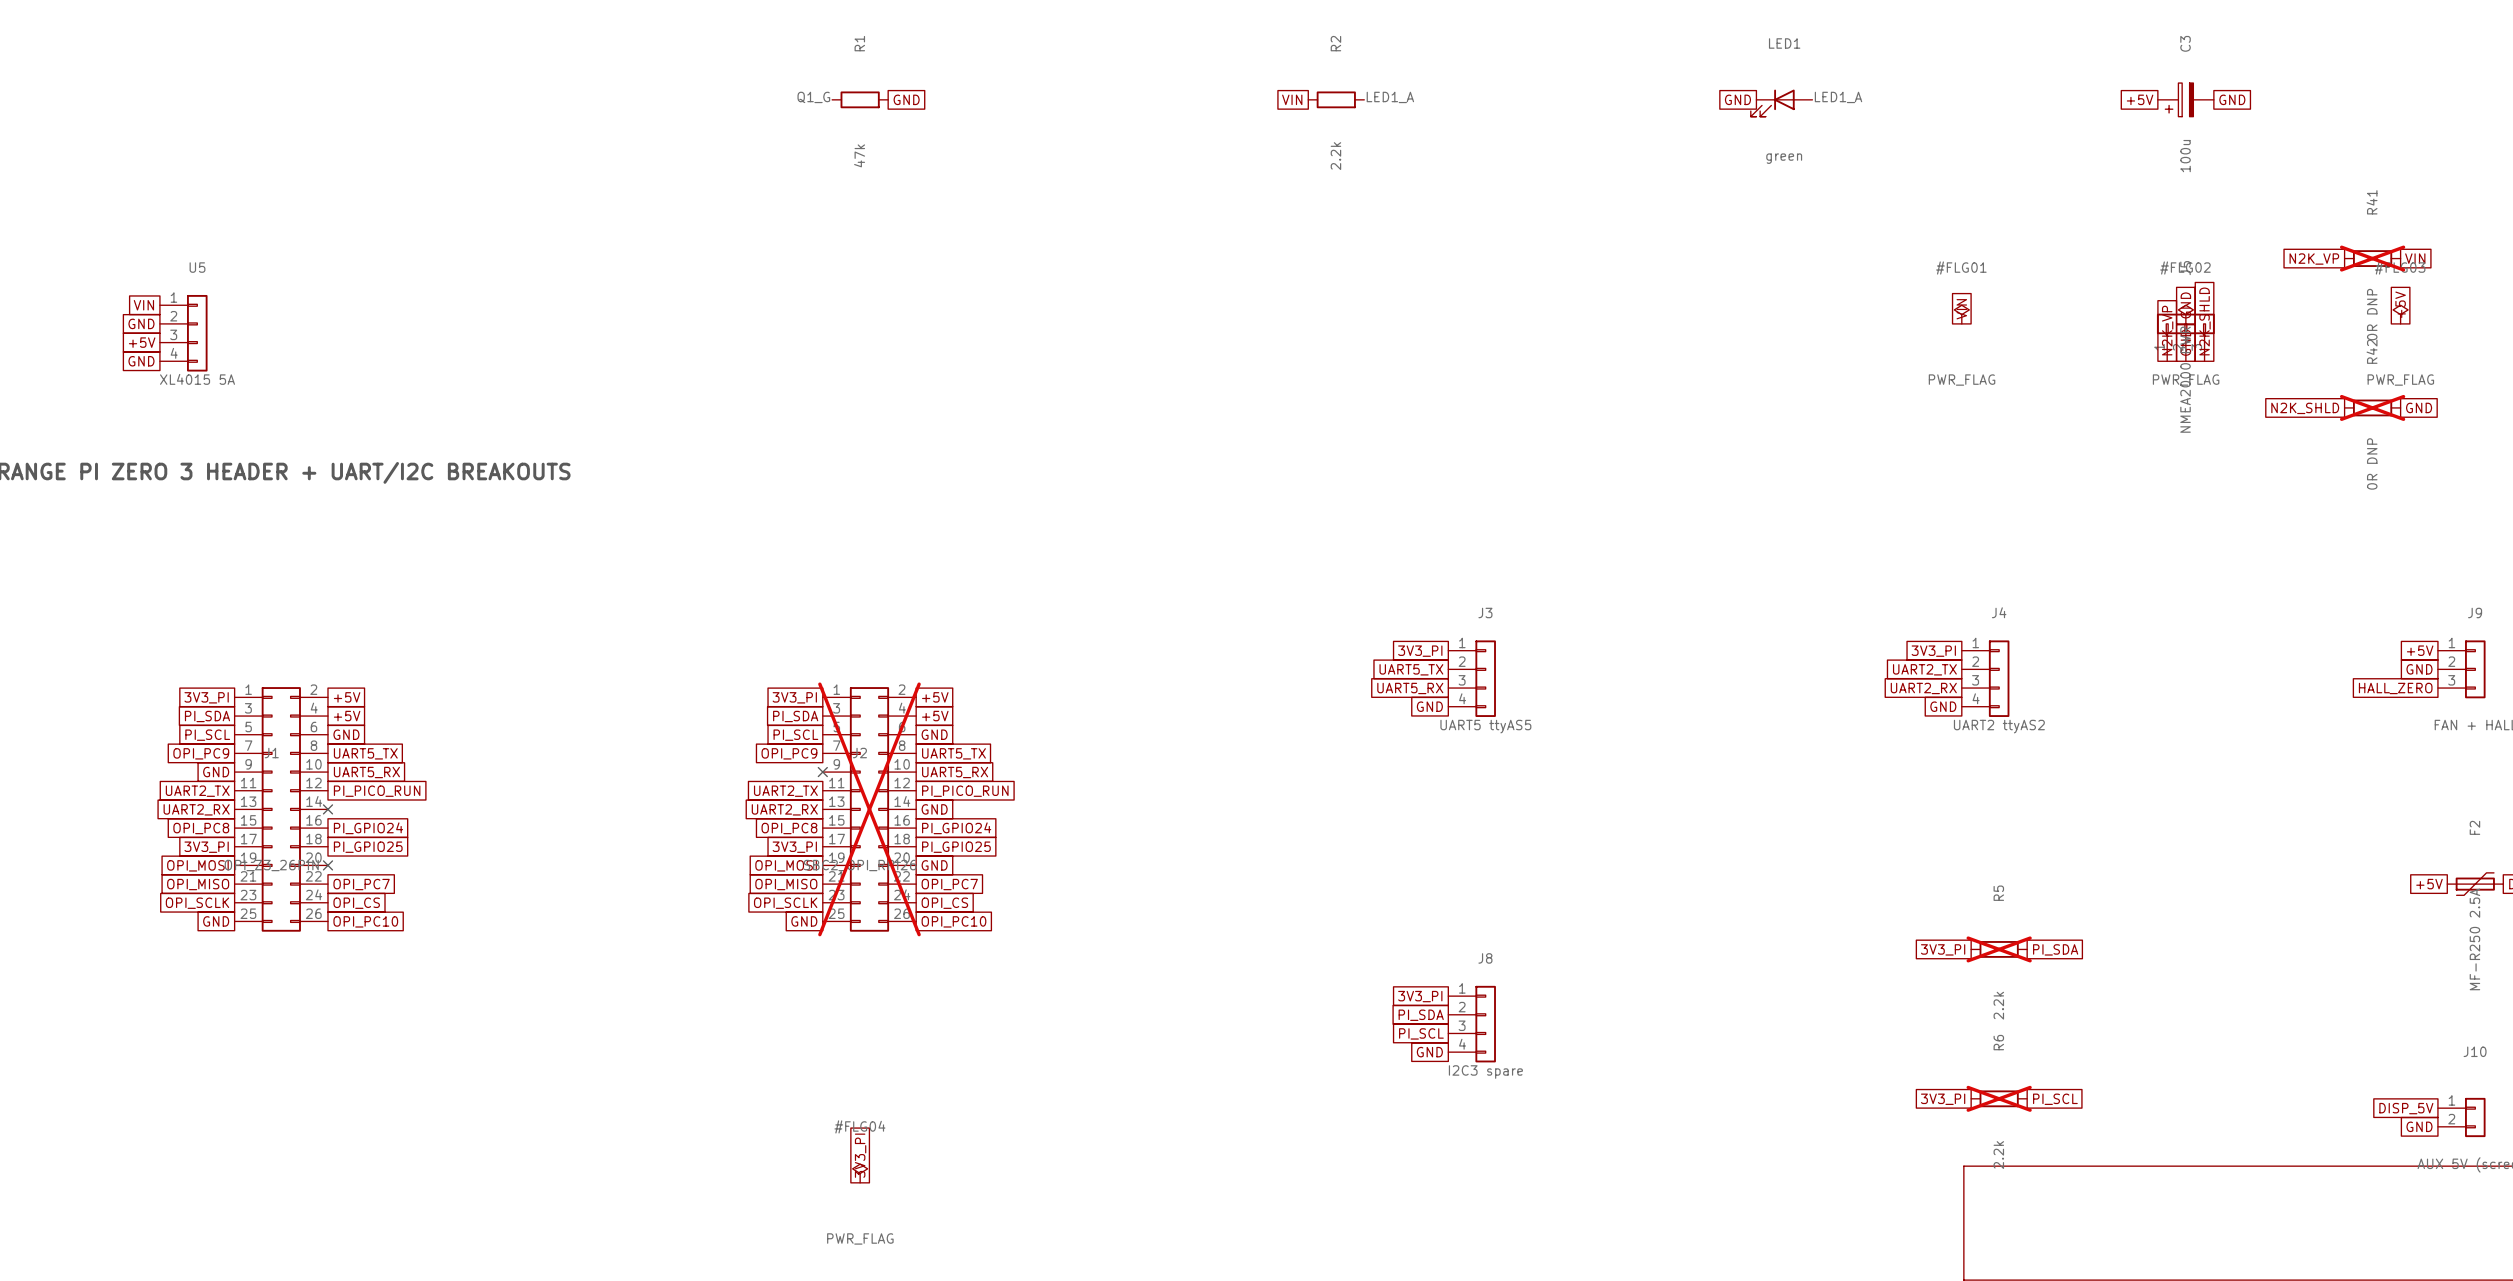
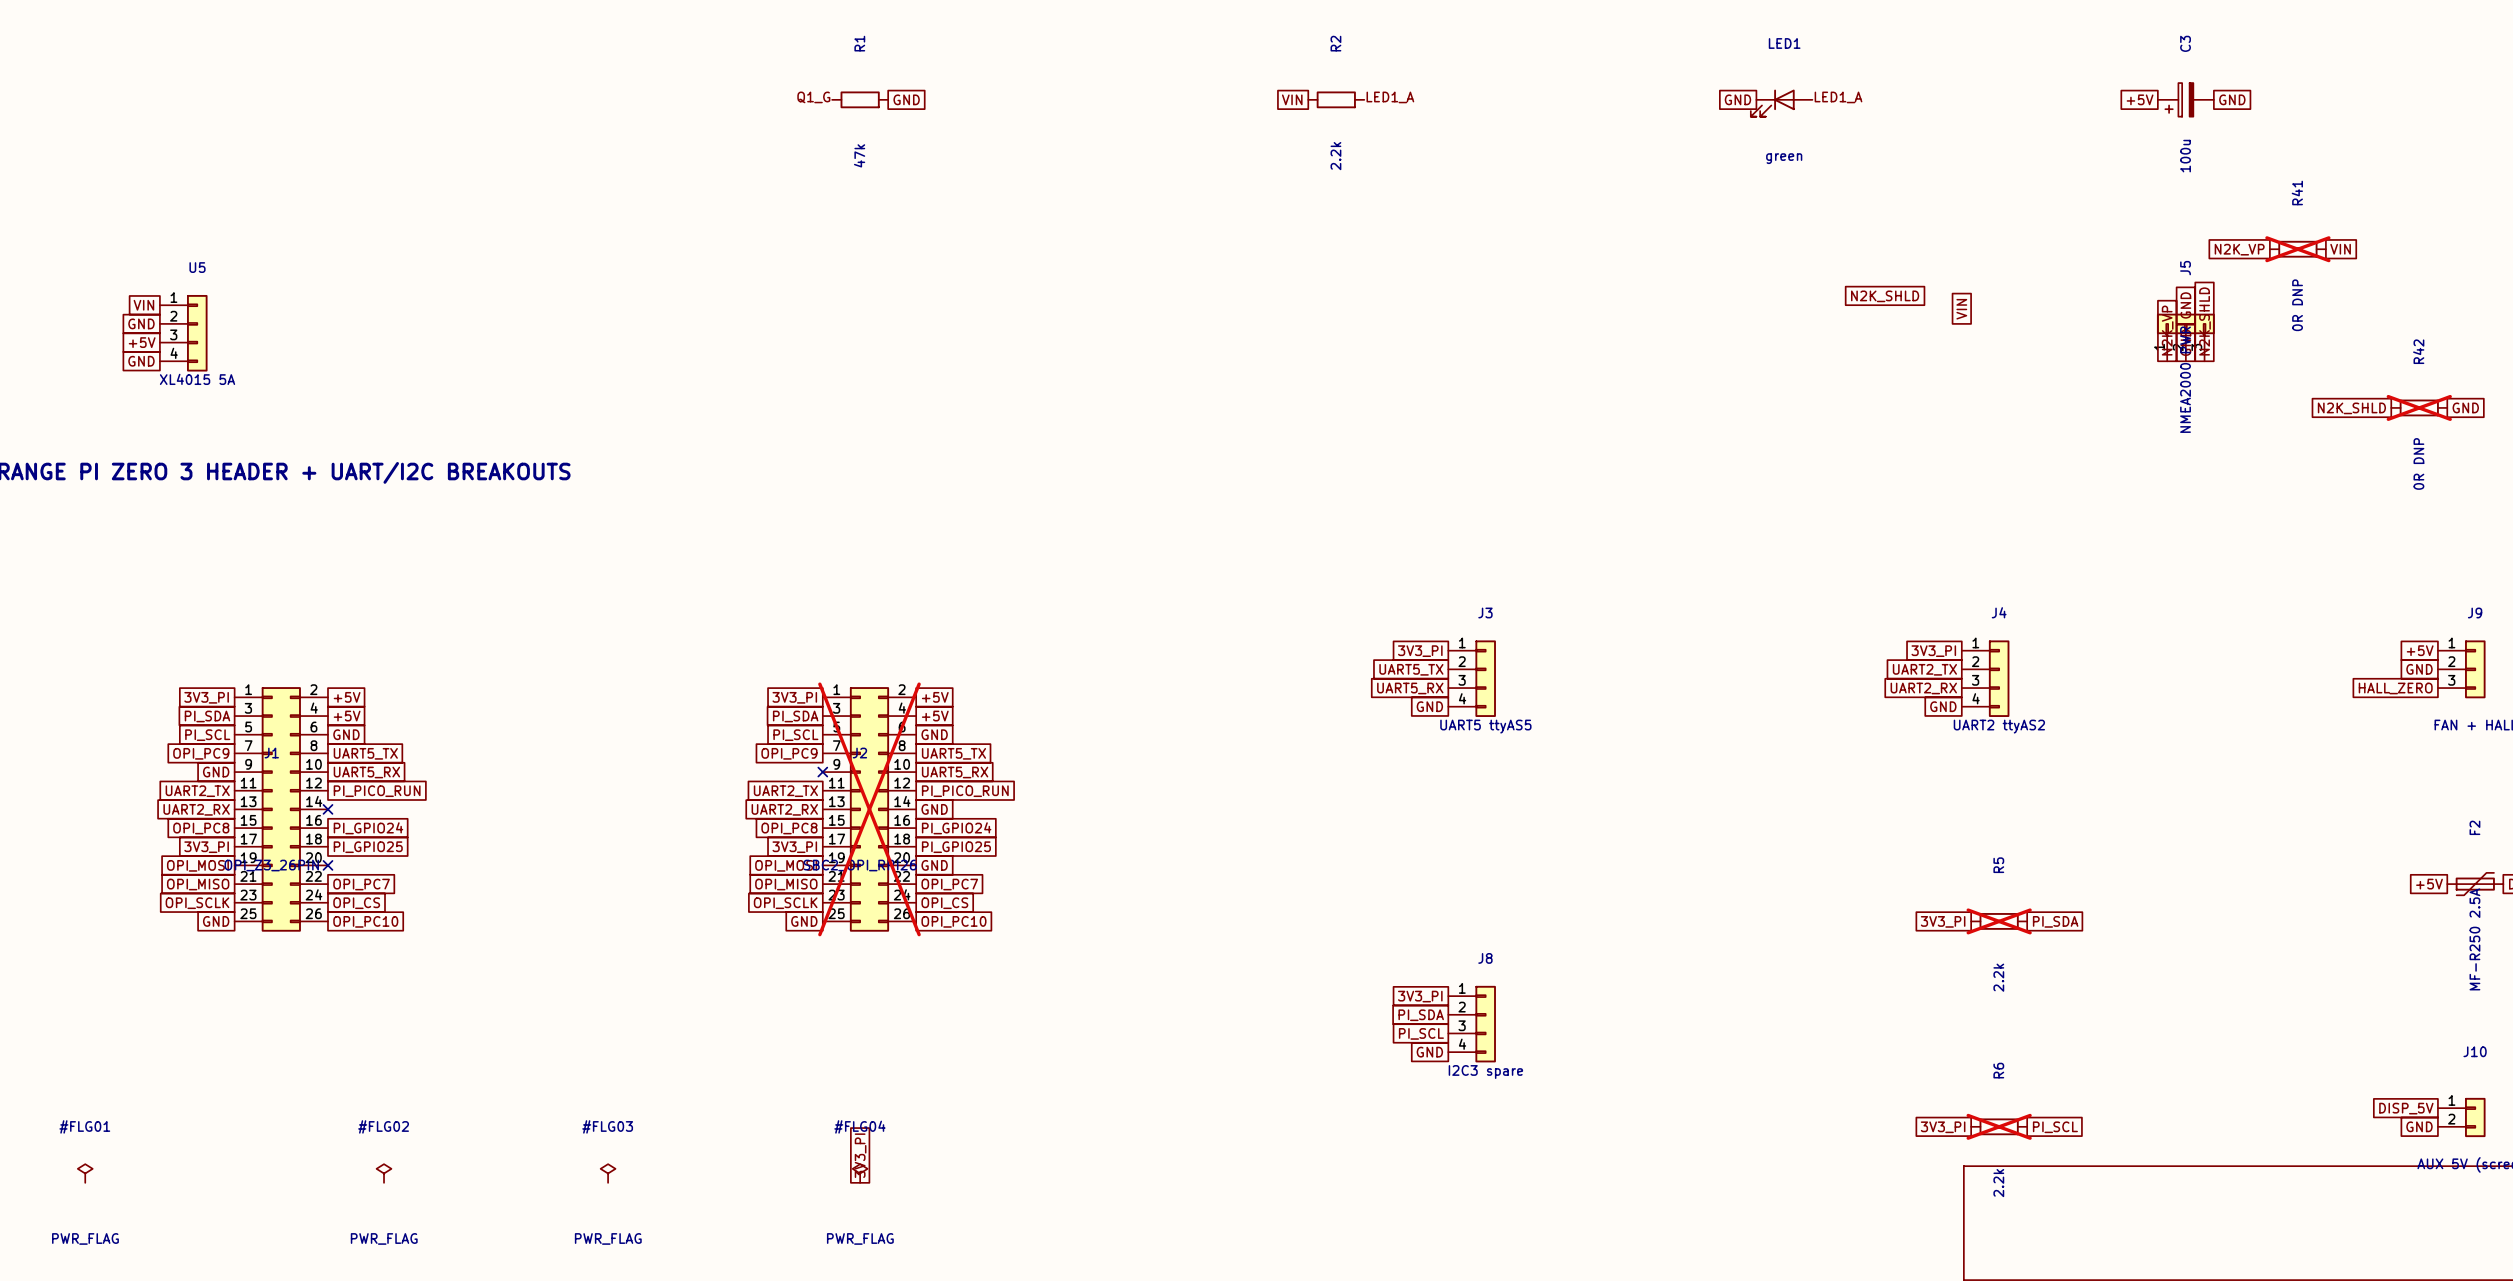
R41 position: (2372, 258) -> (2297, 249)
global label position: VIN (2415, 258) -> VIN (2340, 249)
global label position: N2K_VP (2314, 259) -> N2K_VP (2239, 249)
global label: none -> N2K_SHLD (1885, 296)
global label: +5V (2400, 304) -> none
#FLG01 position: PWR_FLAG (1961, 314) -> PWR_FLAG (85, 1173)
#FLG02 position: PWR_FLAG (2185, 314) -> PWR_FLAG (384, 1173)
#FLG03 position: PWR_FLAG (2400, 314) -> PWR_FLAG (608, 1173)
R42 position: (2372, 407) -> (2419, 407)
global label position: GND (2419, 407) -> GND (2465, 407)
global label position: N2K_SHLD (2305, 408) -> N2K_SHLD (2351, 408)
global label position: 3V3_PI (1943, 949) -> 3V3_PI (1943, 921)
R5 position: (1999, 949) -> (1999, 921)
global label position: PI_SDA (2055, 949) -> PI_SDA (2055, 921)
R6 position: (1999, 1098) -> (1999, 1126)
global label position: 3V3_PI (1943, 1099) -> 3V3_PI (1943, 1127)
global label position: PI_SCL (2055, 1099) -> PI_SCL (2055, 1127)

